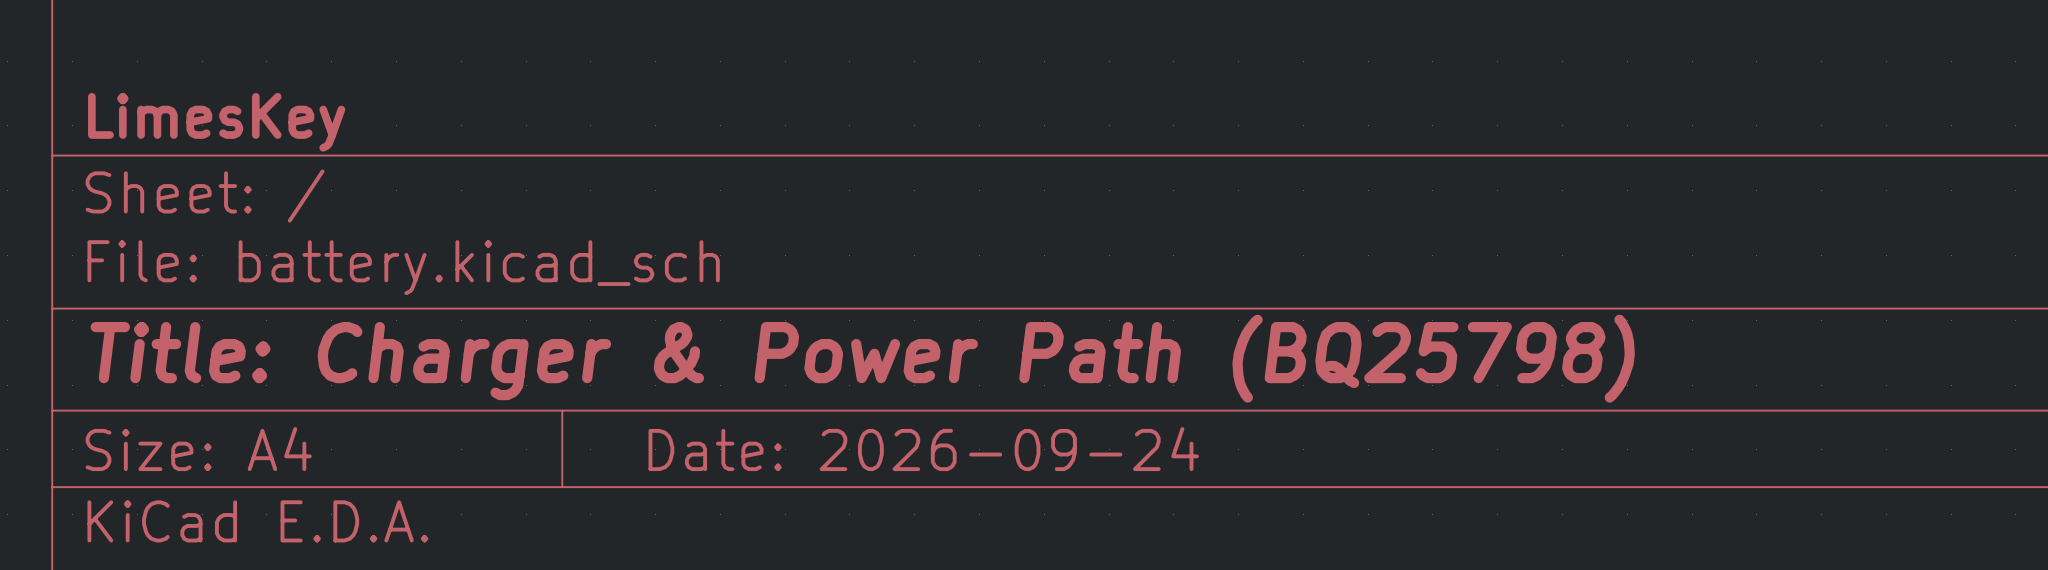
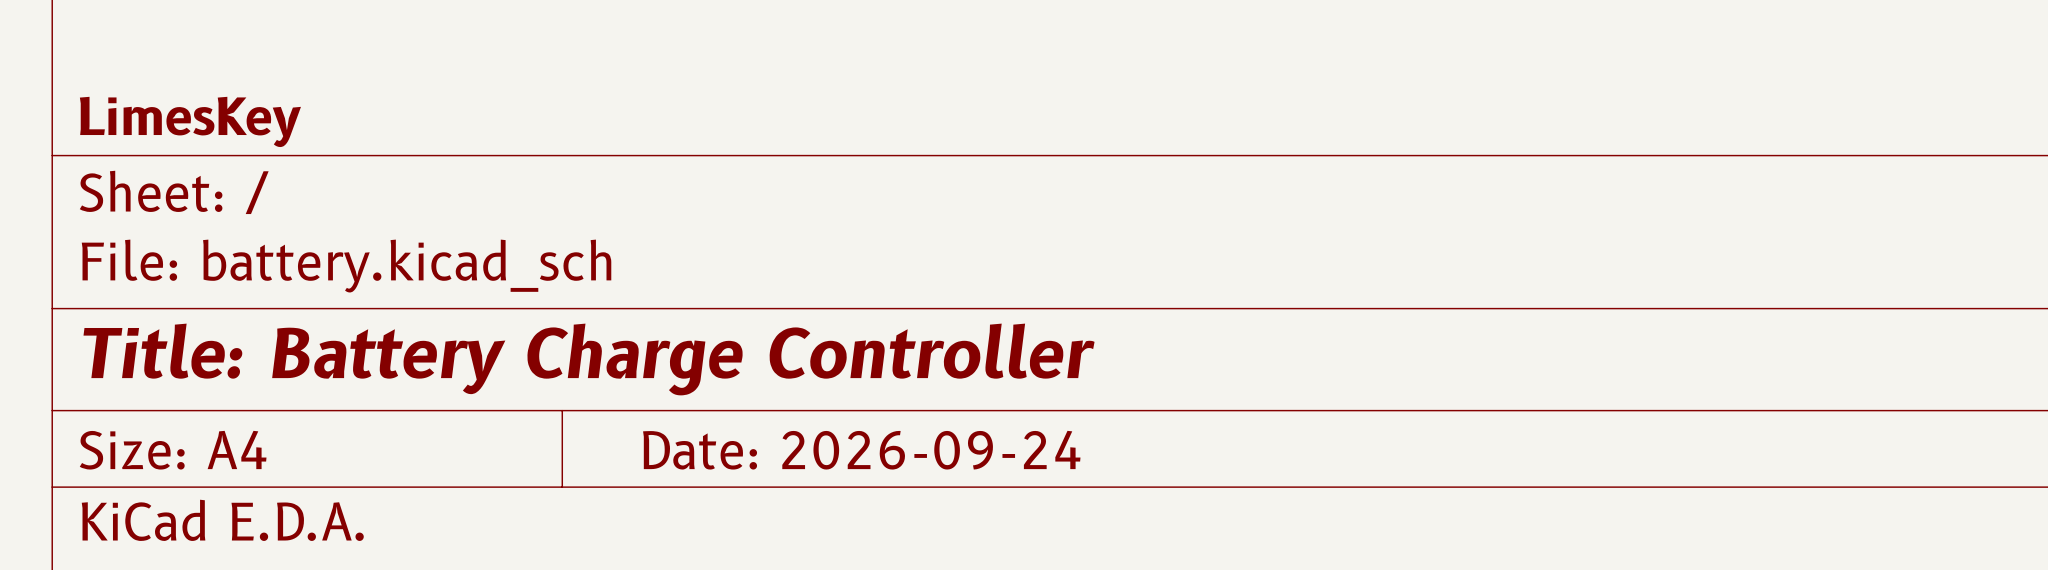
title block: Title: Charger & Power Path (BQ25798) (862, 358) -> Title: Battery Charge Controller (589, 359)

